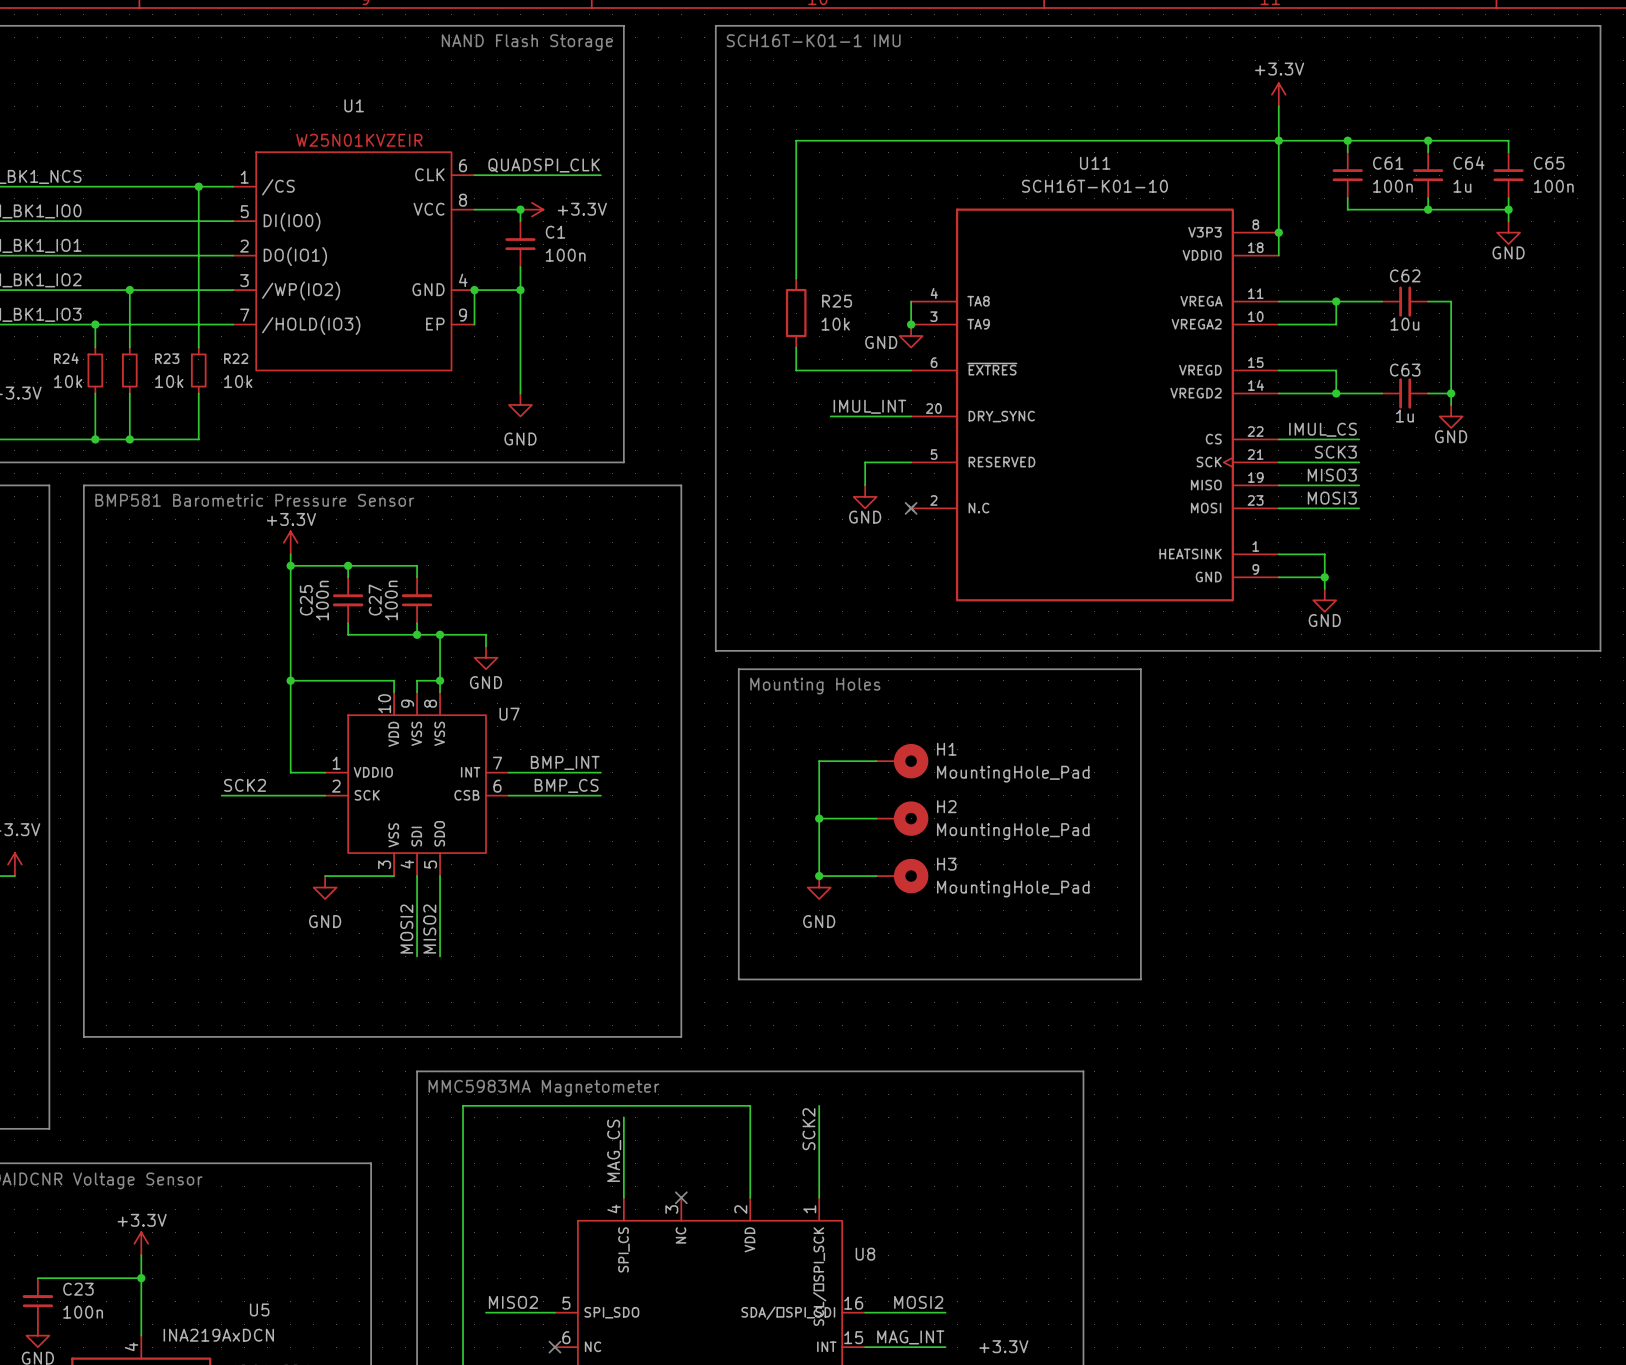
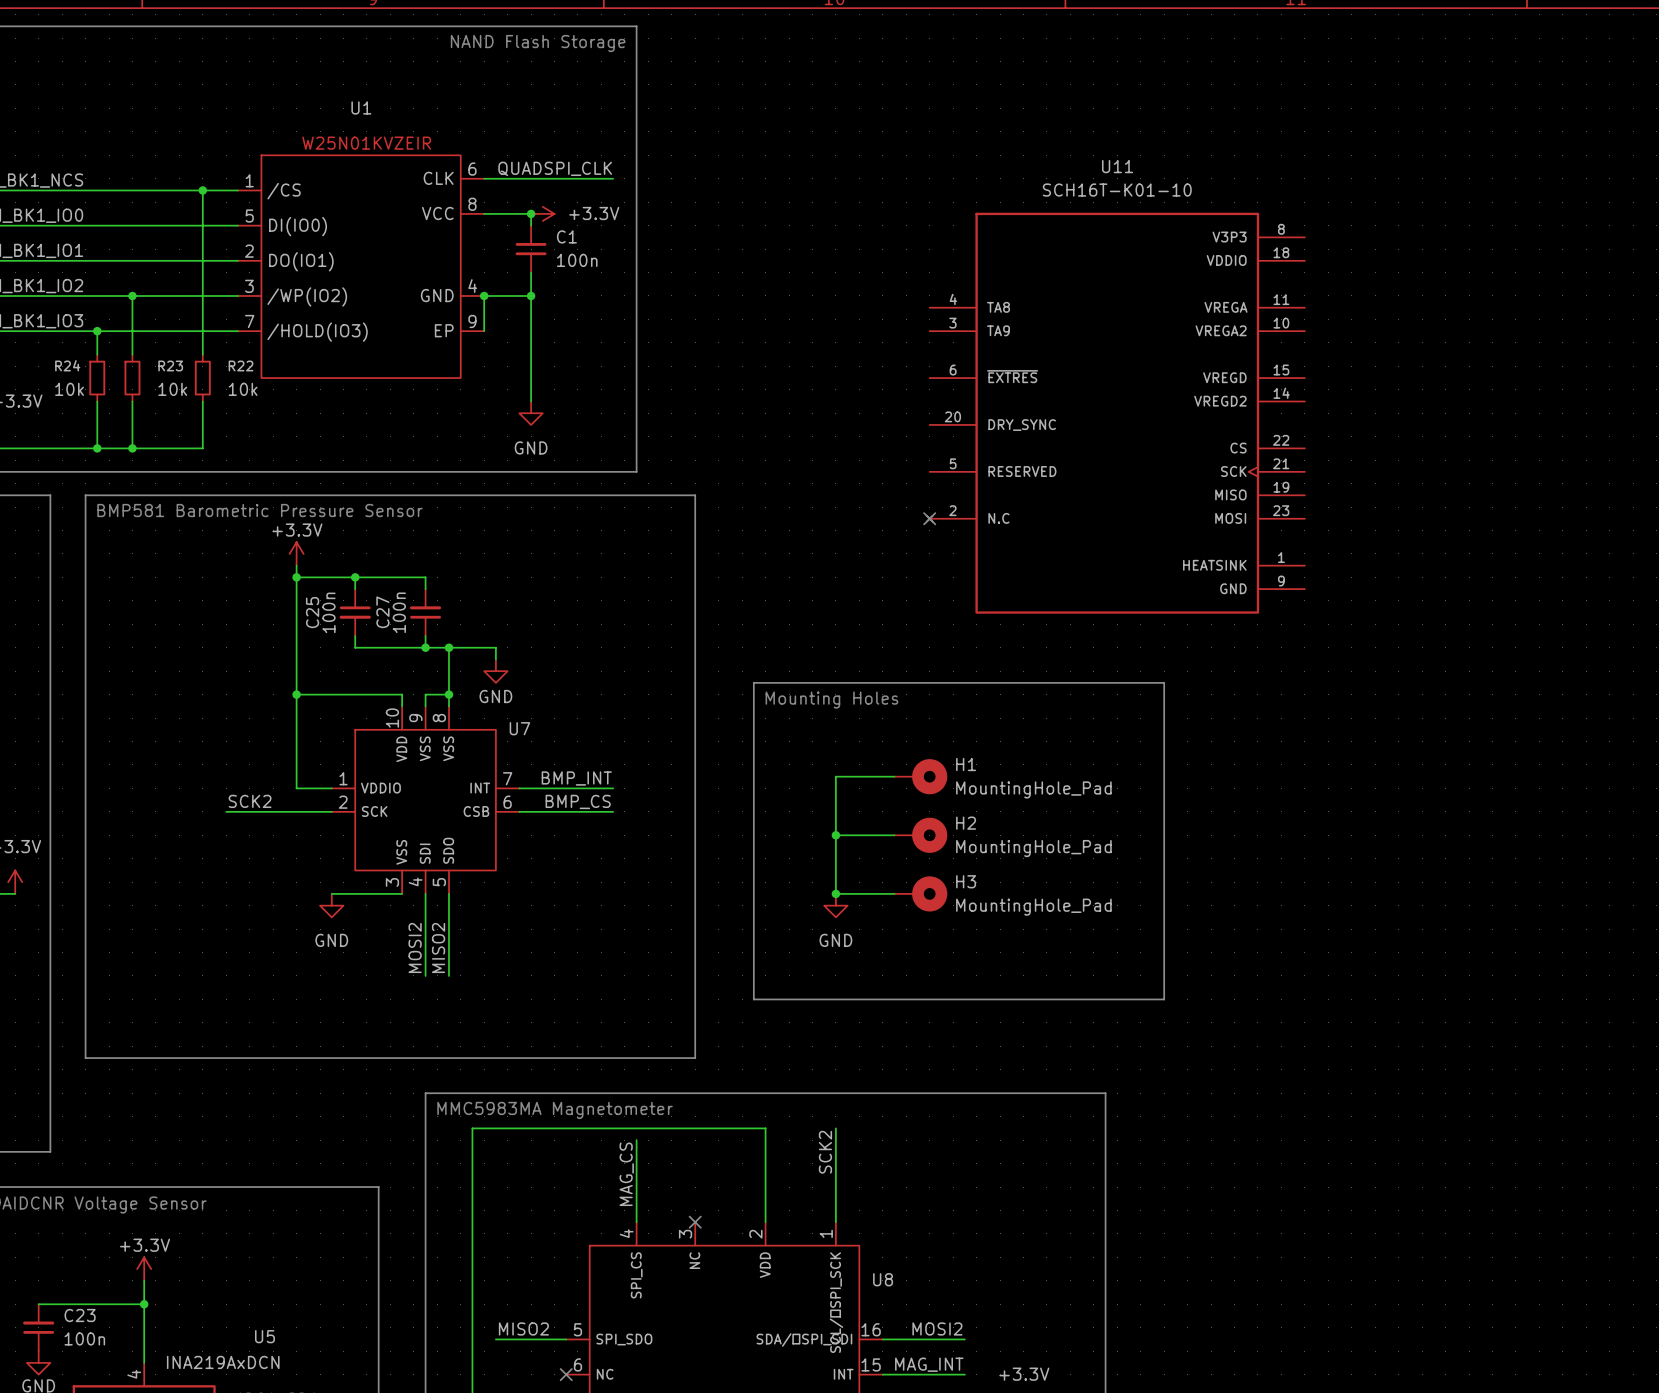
line: (715, 25) (1600, 25) (1600, 650) (715, 650) (715, 25) -> none
text: SCH16T-K01-1 IMU (813, 40) -> none
power symbol: +3.3V (1278, 94) -> none
wire: (1278, 106) (1278, 255) -> none
junction: (1278, 140) -> none
wire: (1347, 140) (1347, 152) -> none
junction: (1347, 140) -> none
wire: (1428, 140) (1428, 152) -> none
junction: (1428, 140) -> none
wire: (1508, 152) (1508, 140) (796, 140) (796, 278) -> none
C61: 100n (1347, 175) -> none
C64: 1u (1428, 175) -> none
C65: 100n (1508, 175) -> none
wire: (1347, 198) (1347, 209) (1508, 209) -> none
wire: (1428, 198) (1428, 209) -> none
wire: (1508, 198) (1508, 221) -> none
junction: (1428, 209) -> none
junction: (1508, 209) -> none
junction: (1278, 232) -> none
power symbol: GND (1508, 232) -> none
wire: (911, 301) (911, 324) -> none
wire: (1278, 301) (1382, 301) -> none
wire: (1336, 301) (1336, 324) (1278, 324) -> none
junction: (1336, 301) -> none
C62: 10u (1405, 301) -> none
wire: (1428, 301) (1451, 301) (1451, 404) -> none
R25: 10k (796, 313) -> none
junction: (911, 324) -> none
power symbol: GND (911, 336) -> none
wire: (796, 347) (796, 370) (911, 370) -> none
wire: (1278, 370) (1336, 370) (1336, 393) -> none
wire: (1278, 393) (1382, 393) -> none
junction: (1336, 393) -> none
C63: 1u (1405, 393) -> none
wire: (1428, 393) (1451, 393) -> none
junction: (1451, 393) -> none
label: IMUL_INT (869, 406) -> none
wire: (830, 416) (911, 416) -> none
power symbol: GND (1451, 416) -> none
label: IMUL_CS (1323, 429) -> none
wire: (1278, 439) (1359, 439) -> none
label: SCK3 (1335, 452) -> none
wire: (911, 462) (865, 462) (865, 485) -> none
wire: (1278, 462) (1359, 462) -> none
label: MISO3 (1332, 475) -> none
wire: (1278, 485) (1359, 485) -> none
power symbol: GND (865, 496) -> none
label: MOSI3 (1332, 498) -> none
wire: (1278, 508) (1359, 508) -> none
wire: (1278, 554) (1324, 554) (1324, 588) -> none
wire: (1278, 577) (1324, 577) -> none
junction: (1324, 577) -> none
power symbol: GND (1324, 600) -> none

